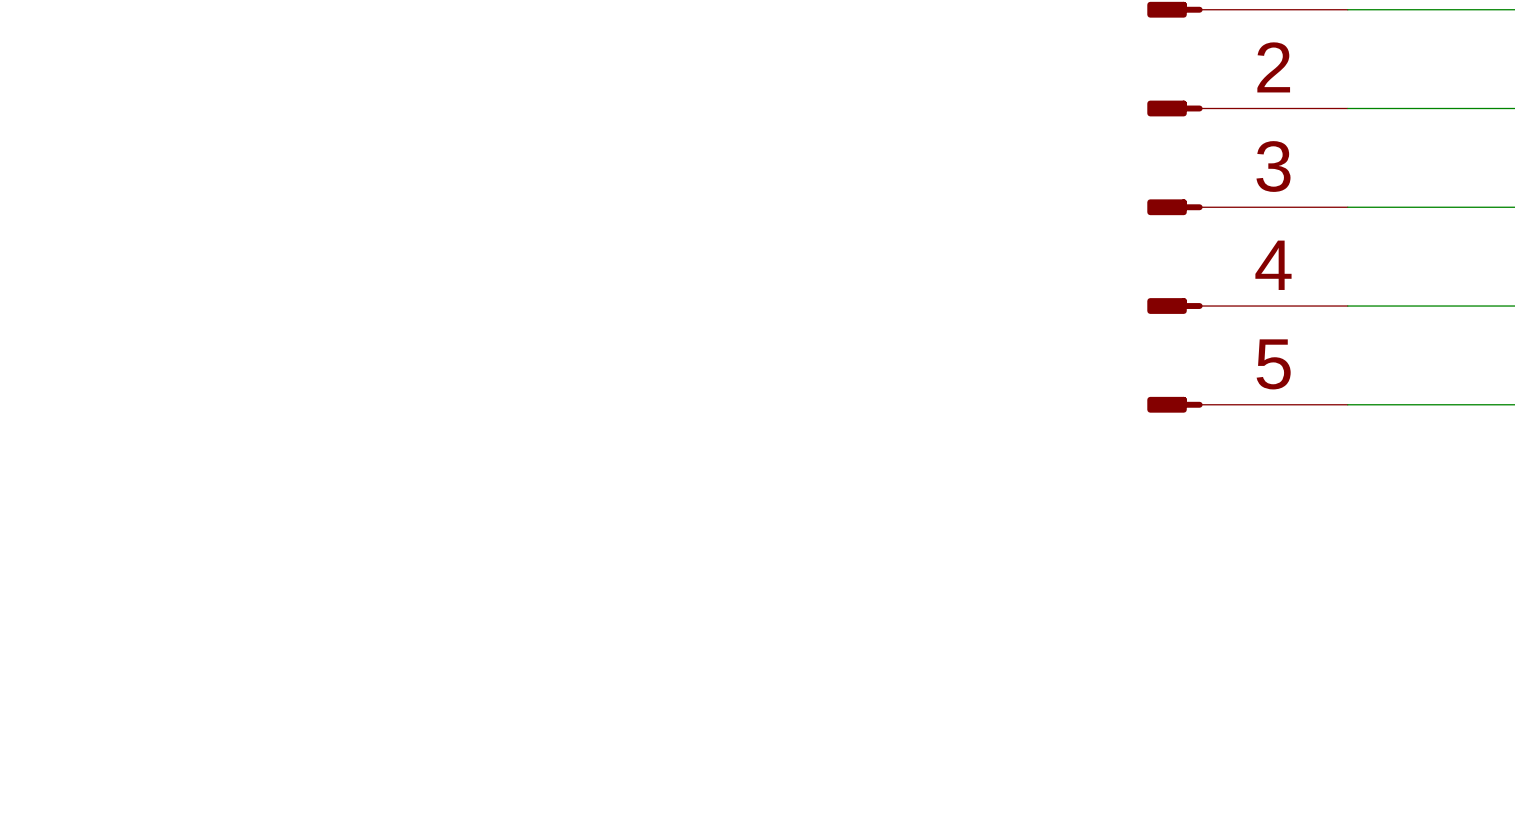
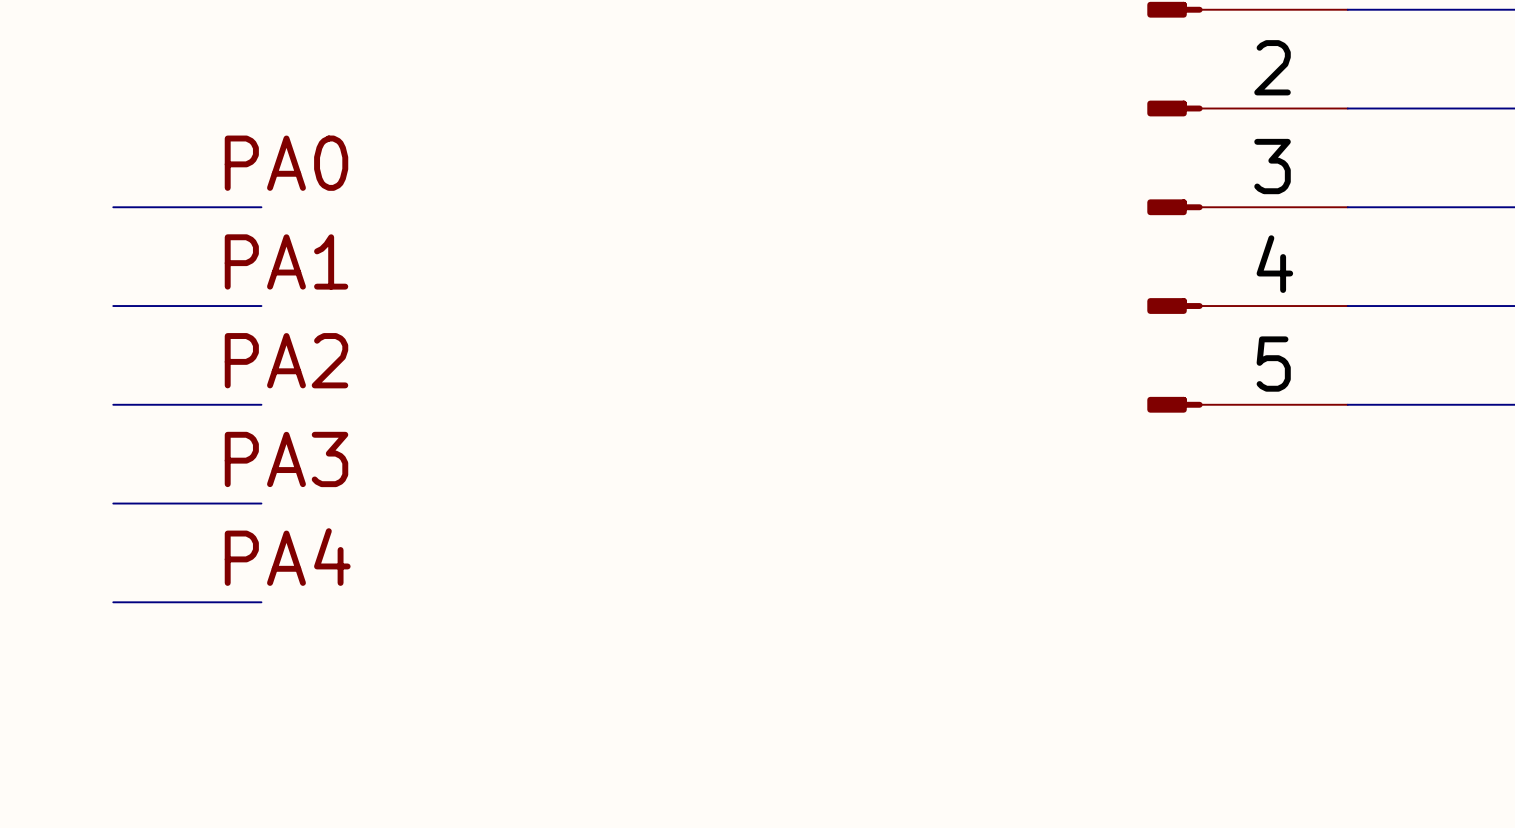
label: none -> PA0 (286, 163)
wire: none -> (113, 207) (261, 207)
label: none -> PA1 (286, 261)
wire: none -> (113, 306) (261, 306)
label: none -> PA2 (286, 360)
wire: none -> (113, 404) (261, 404)
label: none -> PA3 (286, 459)
wire: none -> (113, 503) (261, 503)
label: none -> PA4 (287, 557)
wire: none -> (113, 602) (261, 602)

